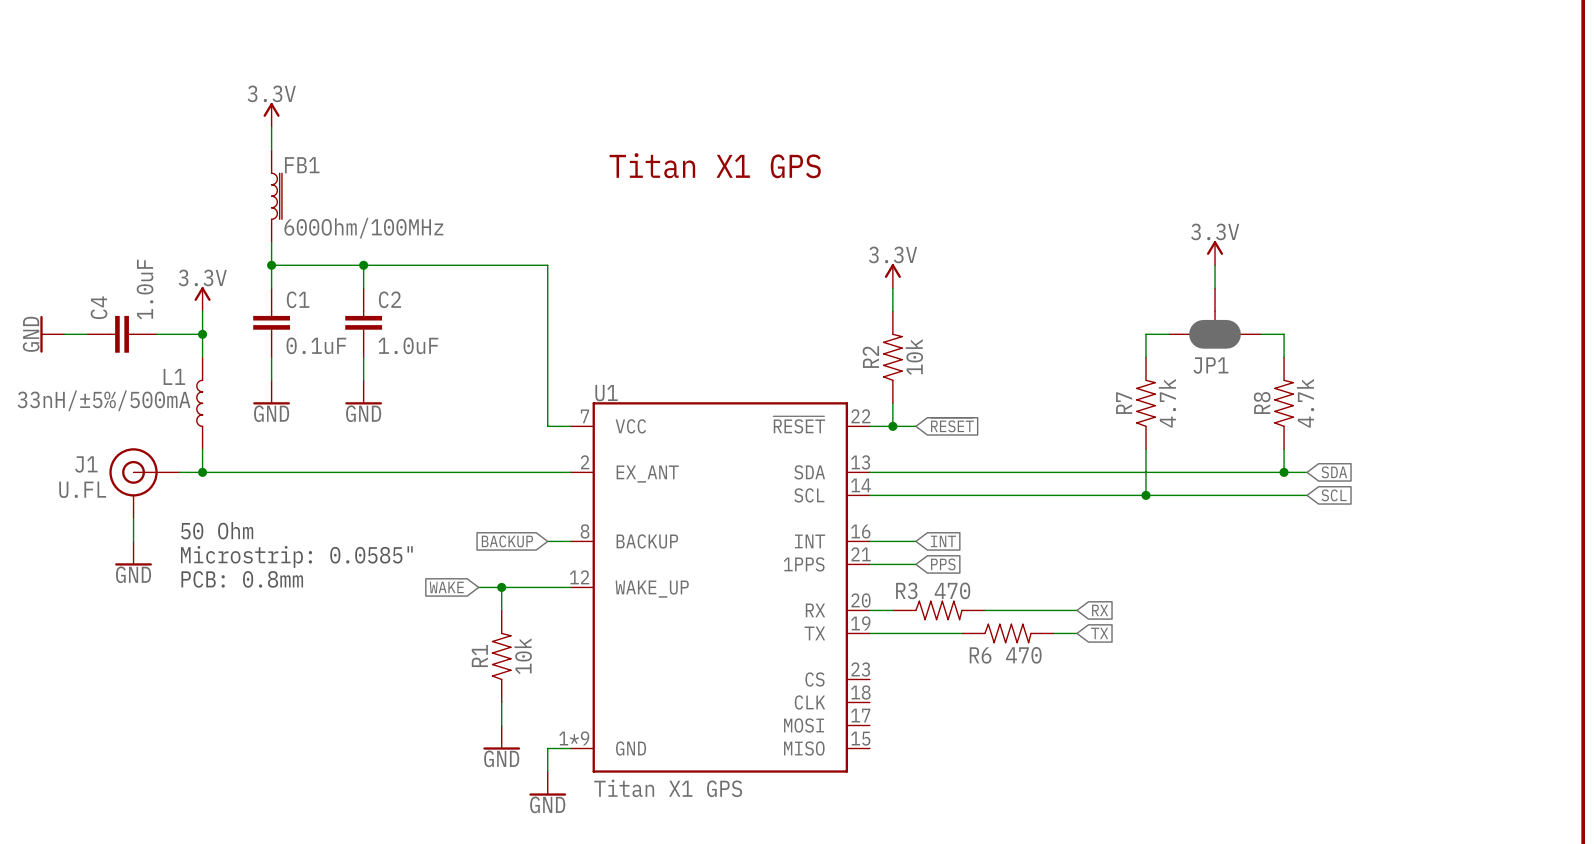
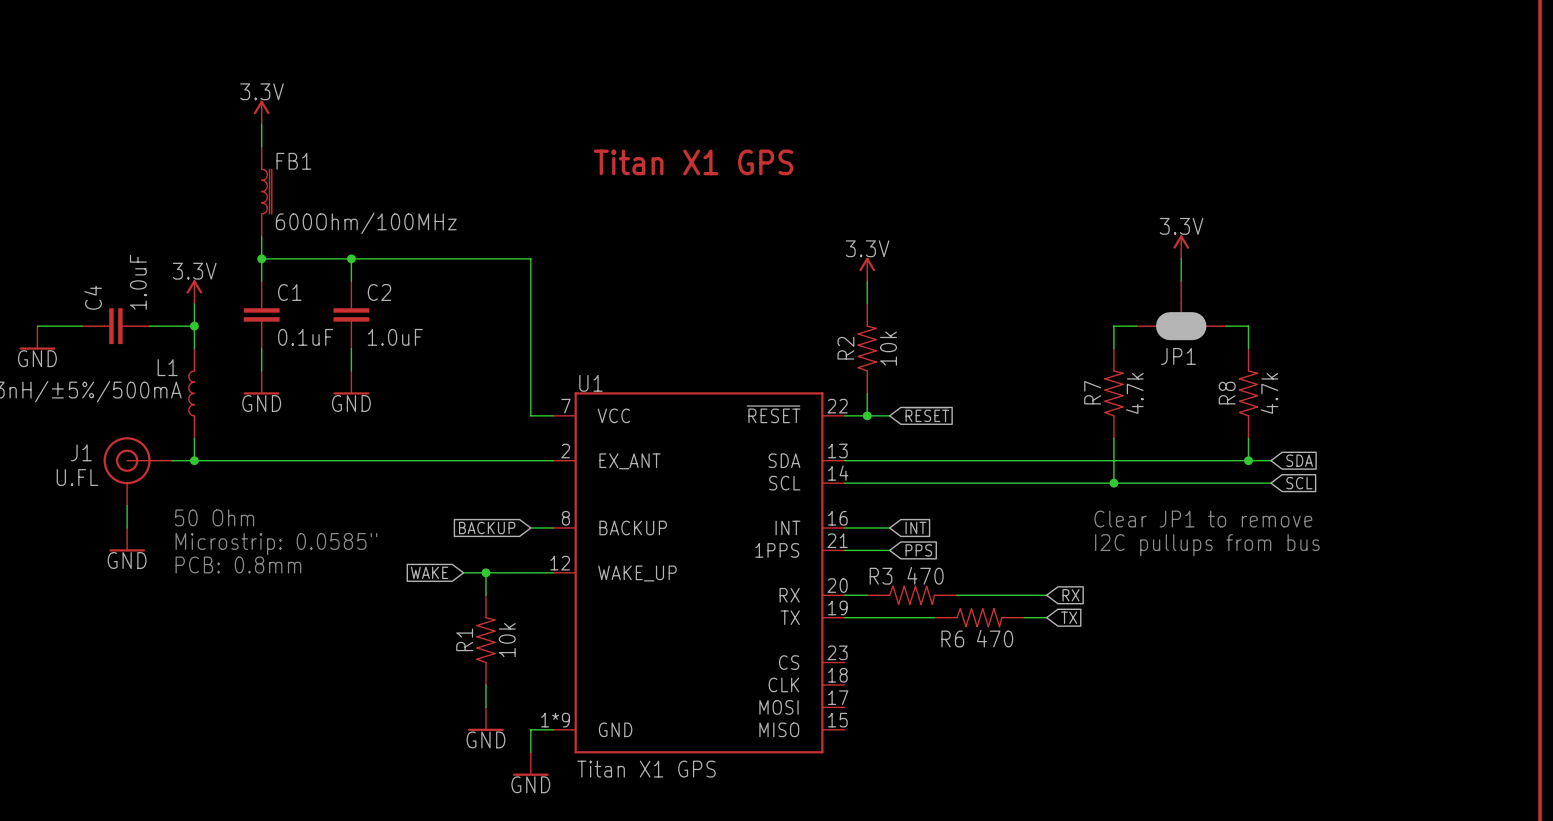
power symbol rotation: 0° (41, 334) -> 90° counterclockwise (37, 348)
text: none -> Clear JP1 to remove (1203, 519)
text: none -> I2C pullups from bus (1207, 545)

